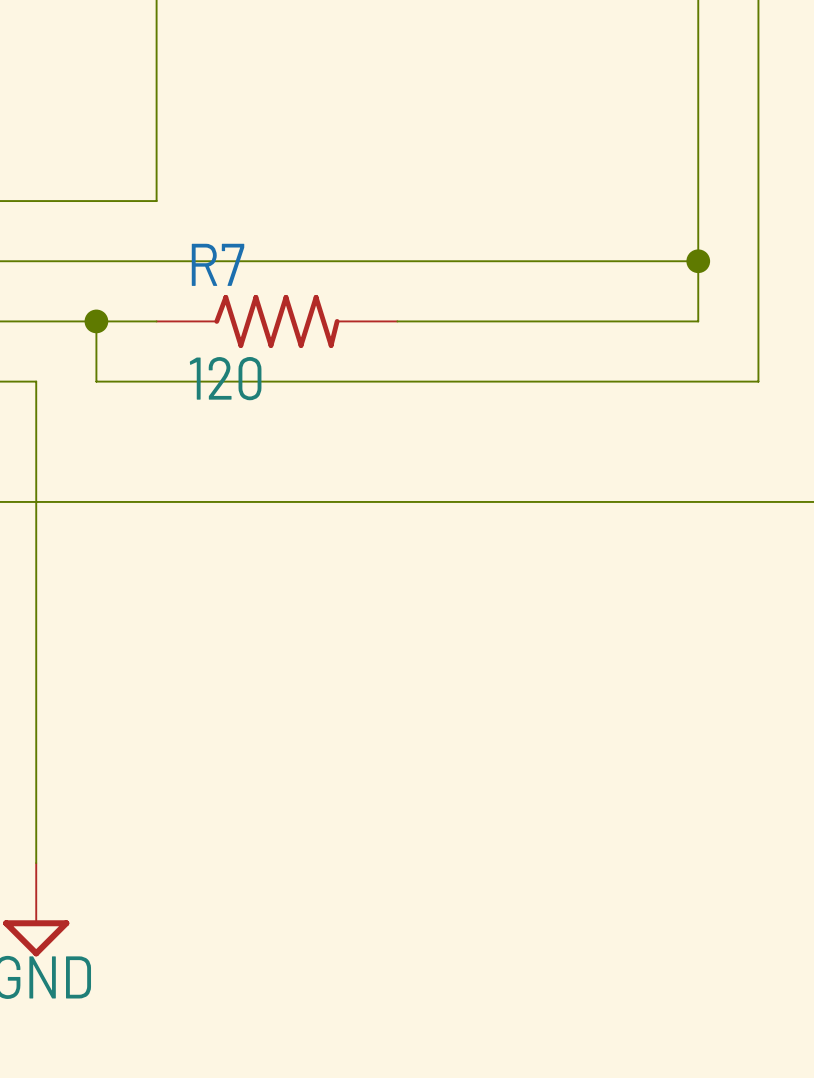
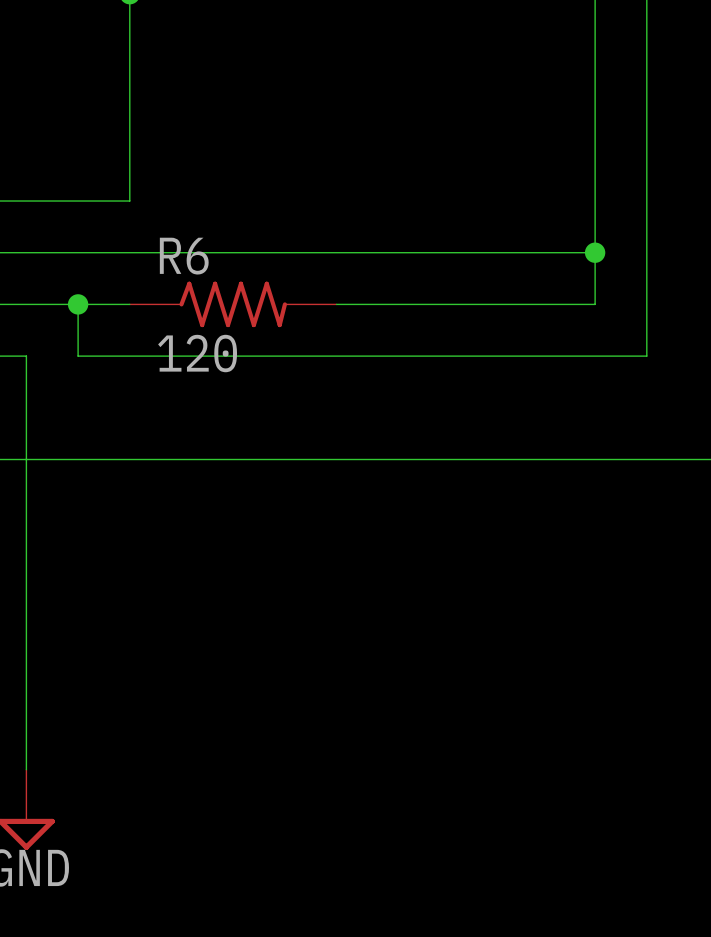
R7 name: R7 (218, 264) -> R6 (184, 256)

